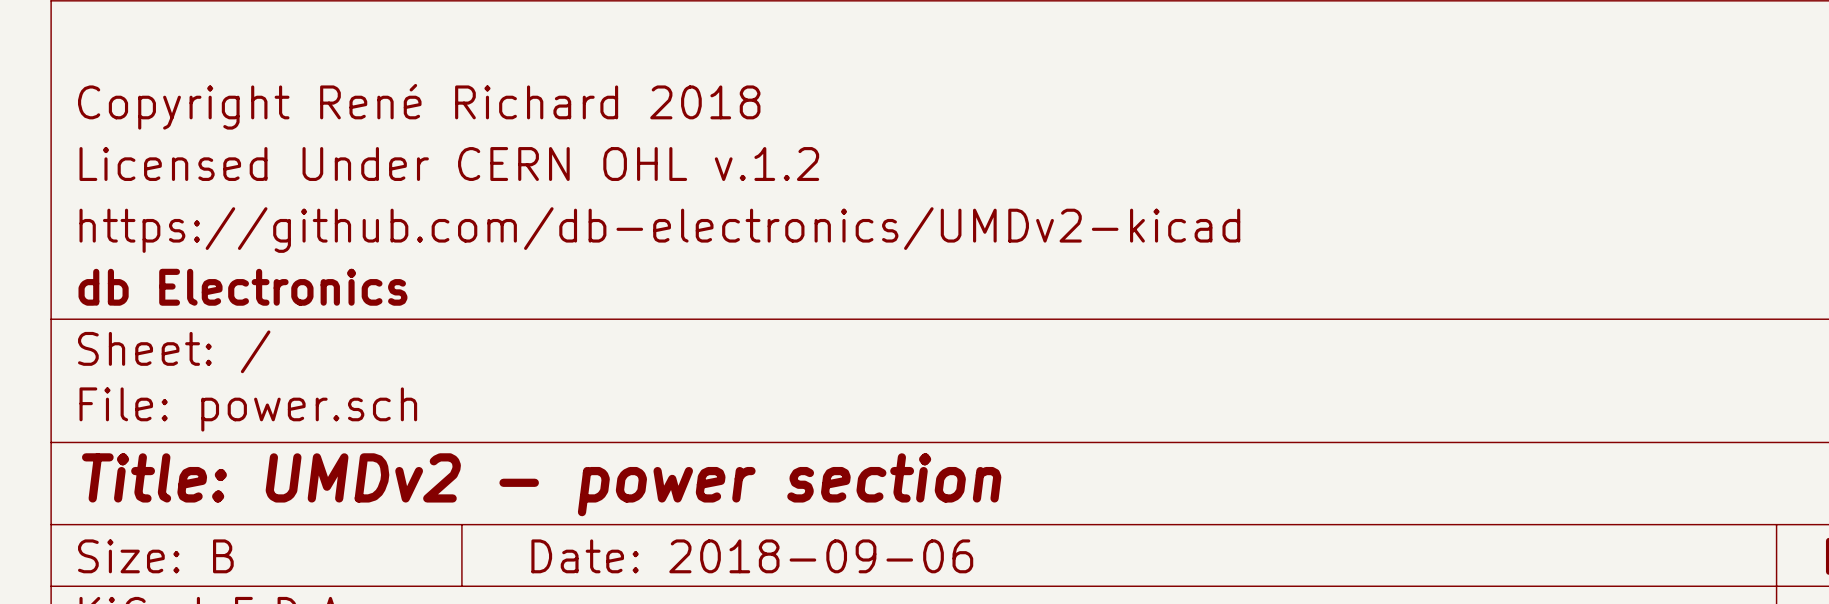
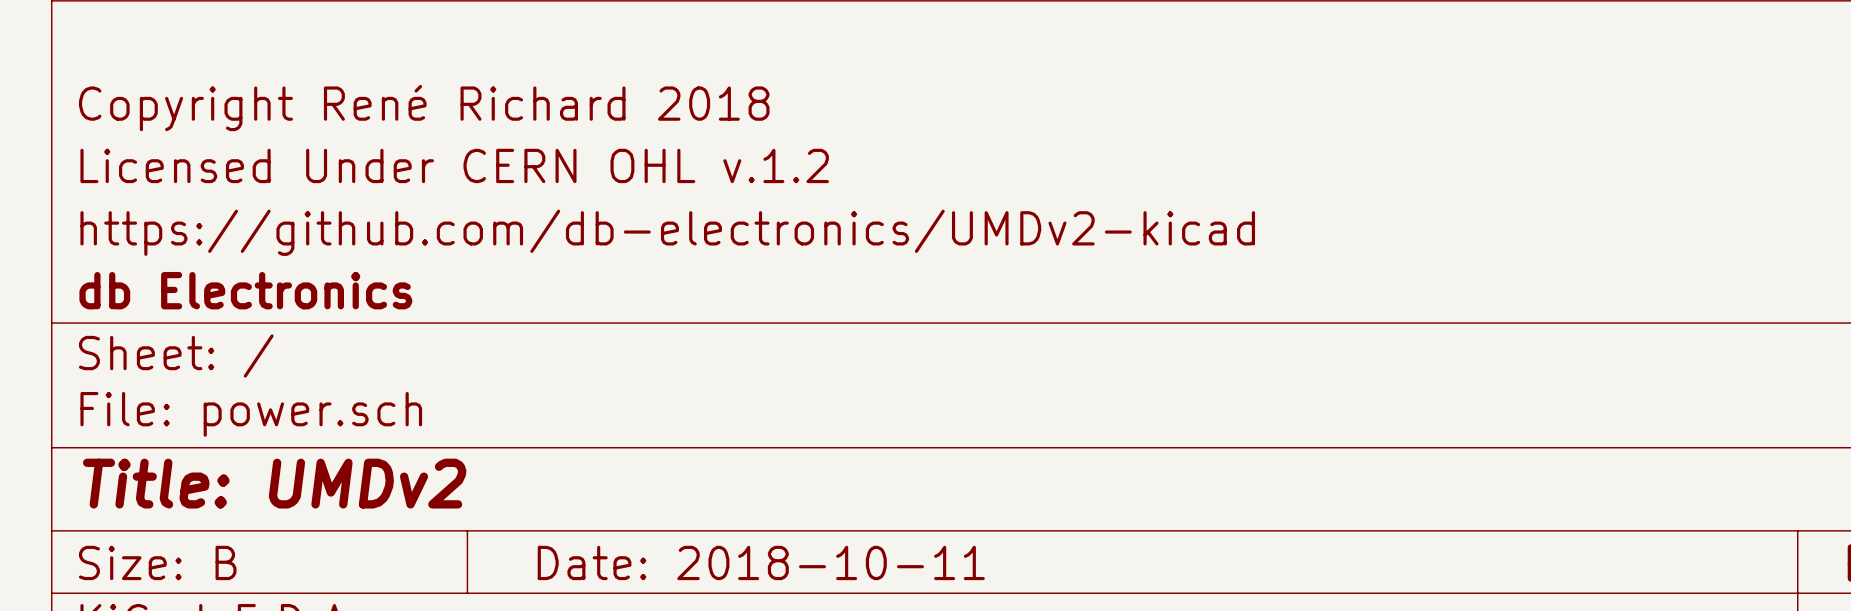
title block: Title: UMDv2 - power section (541, 484) -> Title: UMDv2 (274, 483)
title block: Date: 2018-09-06 (752, 556) -> Date: 2018-10-11 (761, 562)

